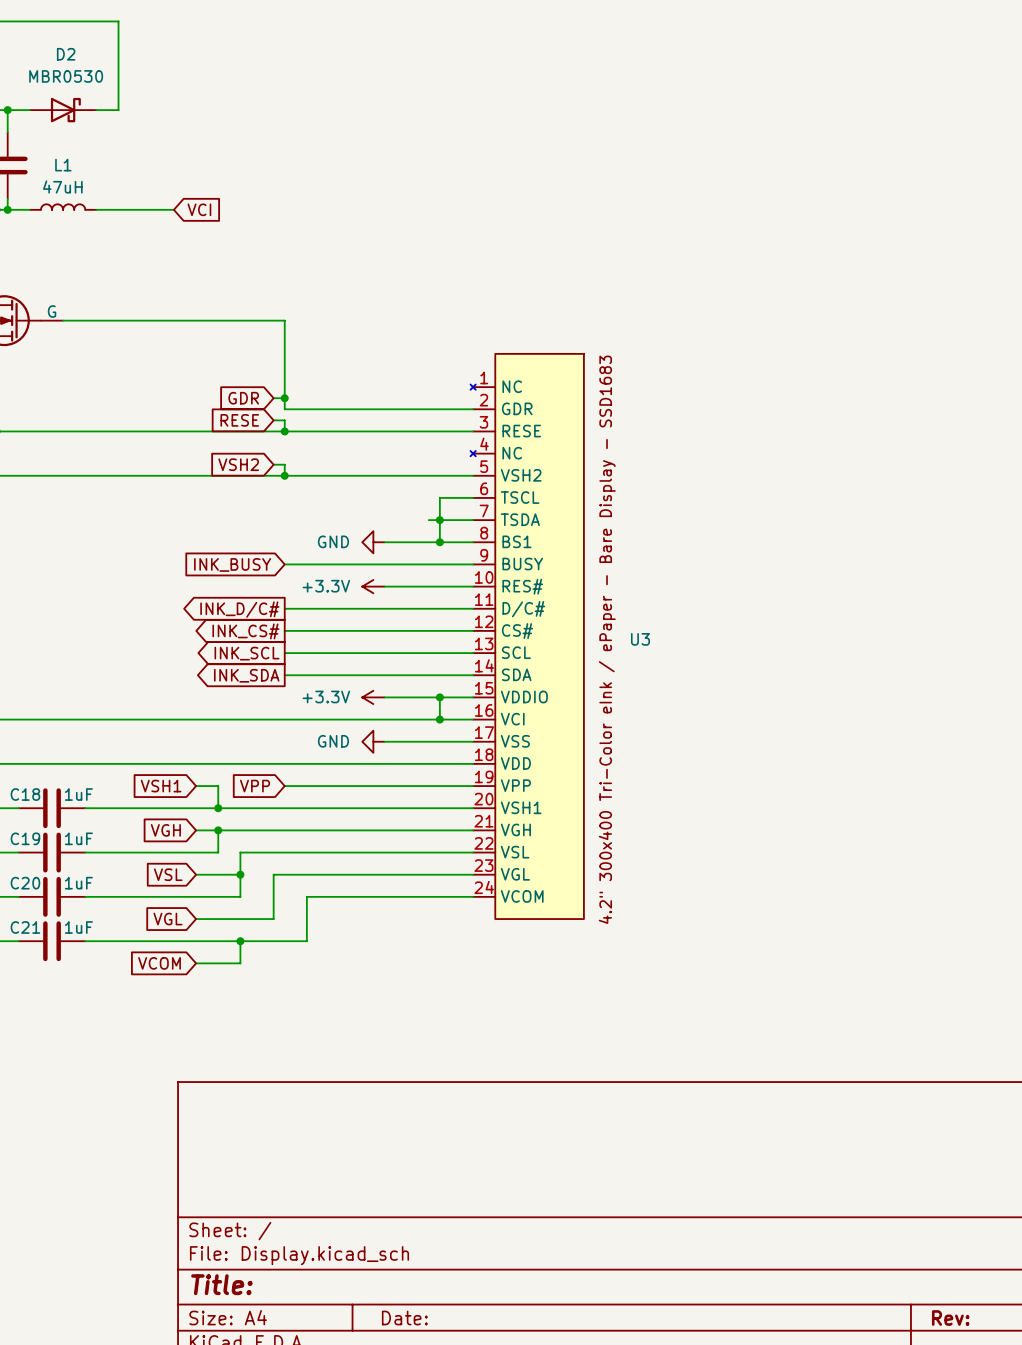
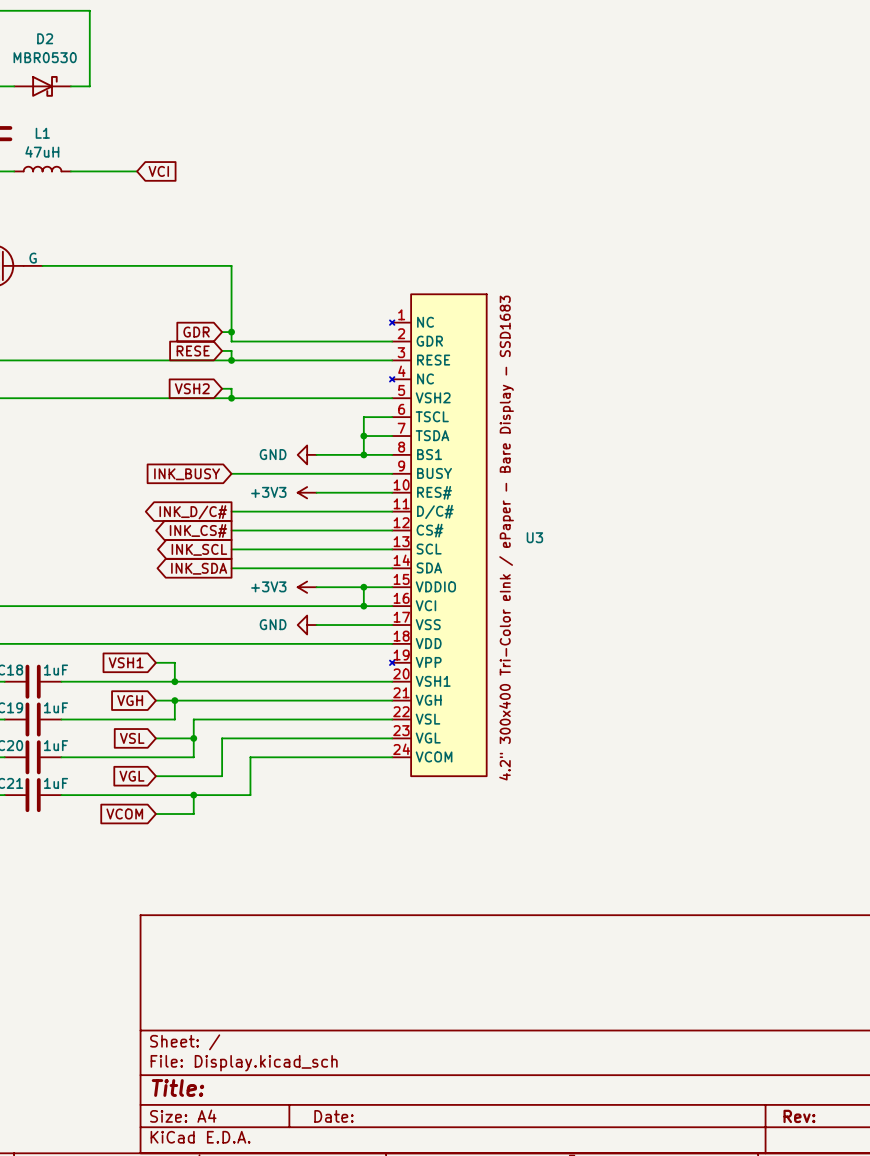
U3 symbol: [470, 353, 584, 920] -> [389, 294, 487, 777]
wire: (428, 520) (439, 520) -> none
power symbol: +3.3V (373, 586) -> +3V3 (307, 492)
power symbol: +3.3V (373, 697) -> +3V3 (307, 587)
global label: VPP (255, 786) -> none
wire: (284, 786) (473, 786) -> none

